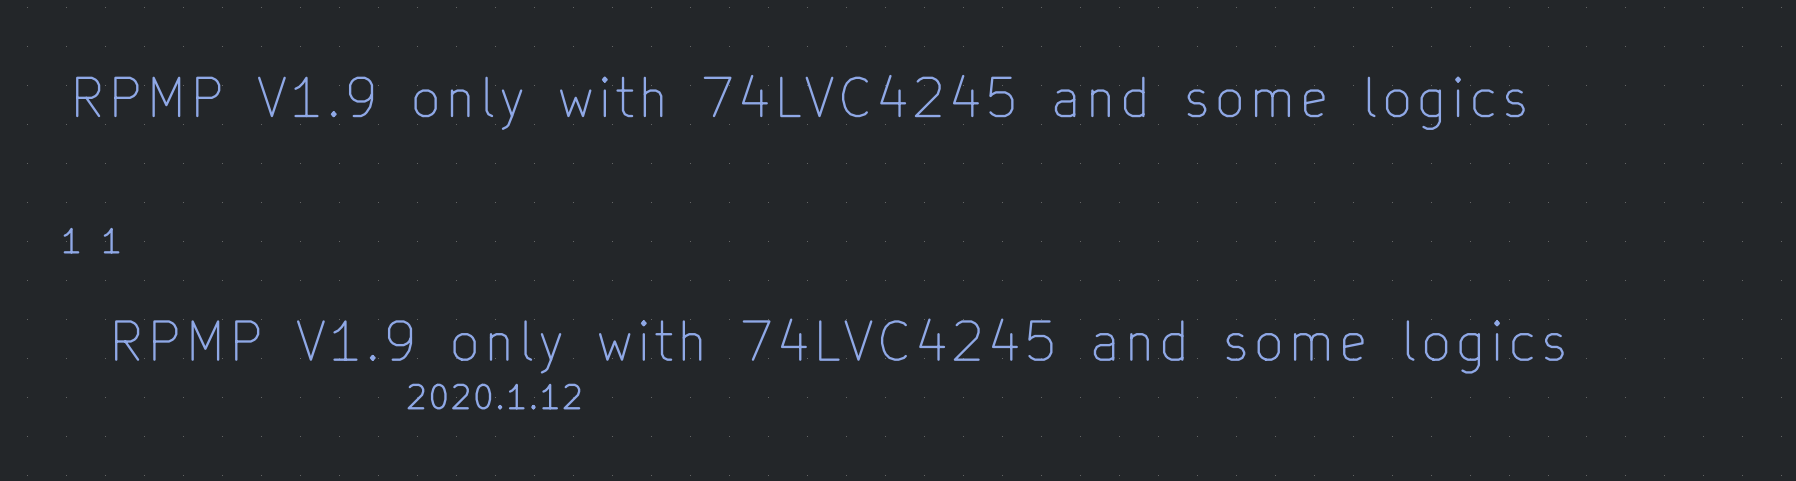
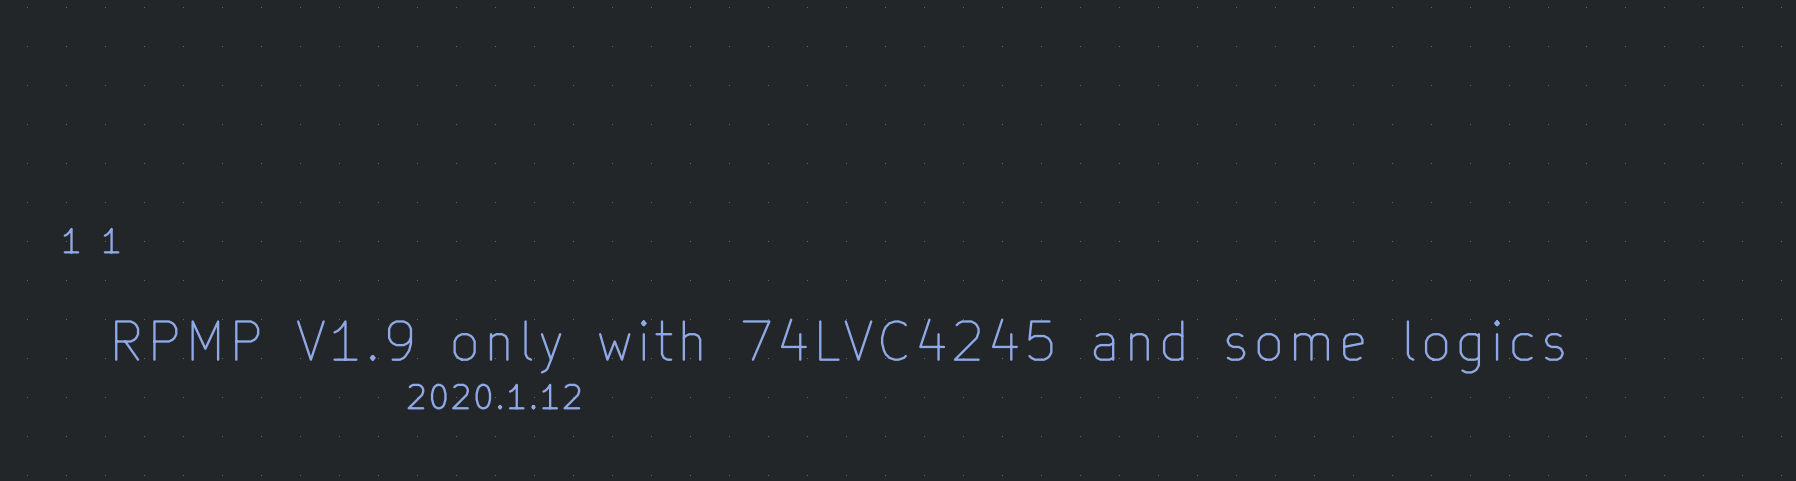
text: RPMP V1.9 only with 74LVC4245 and some logics (800, 102) -> none

